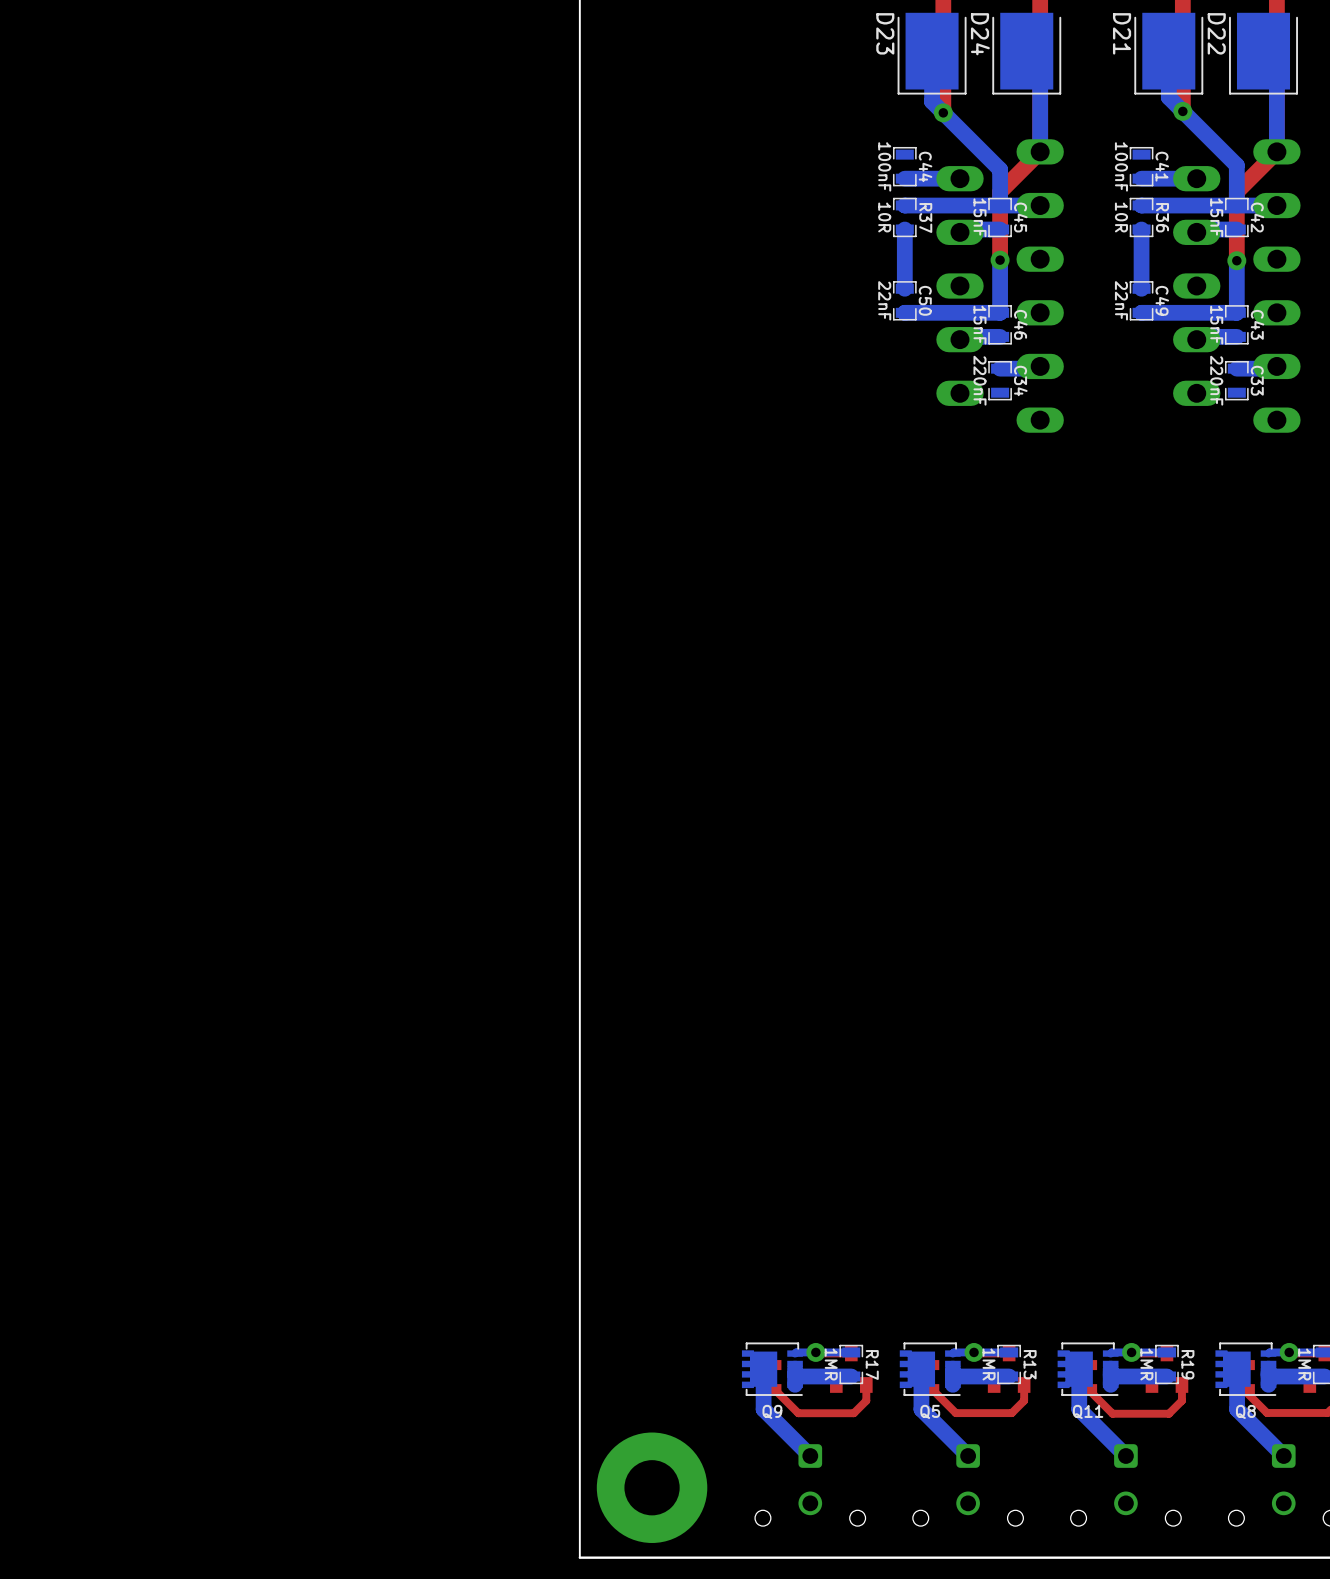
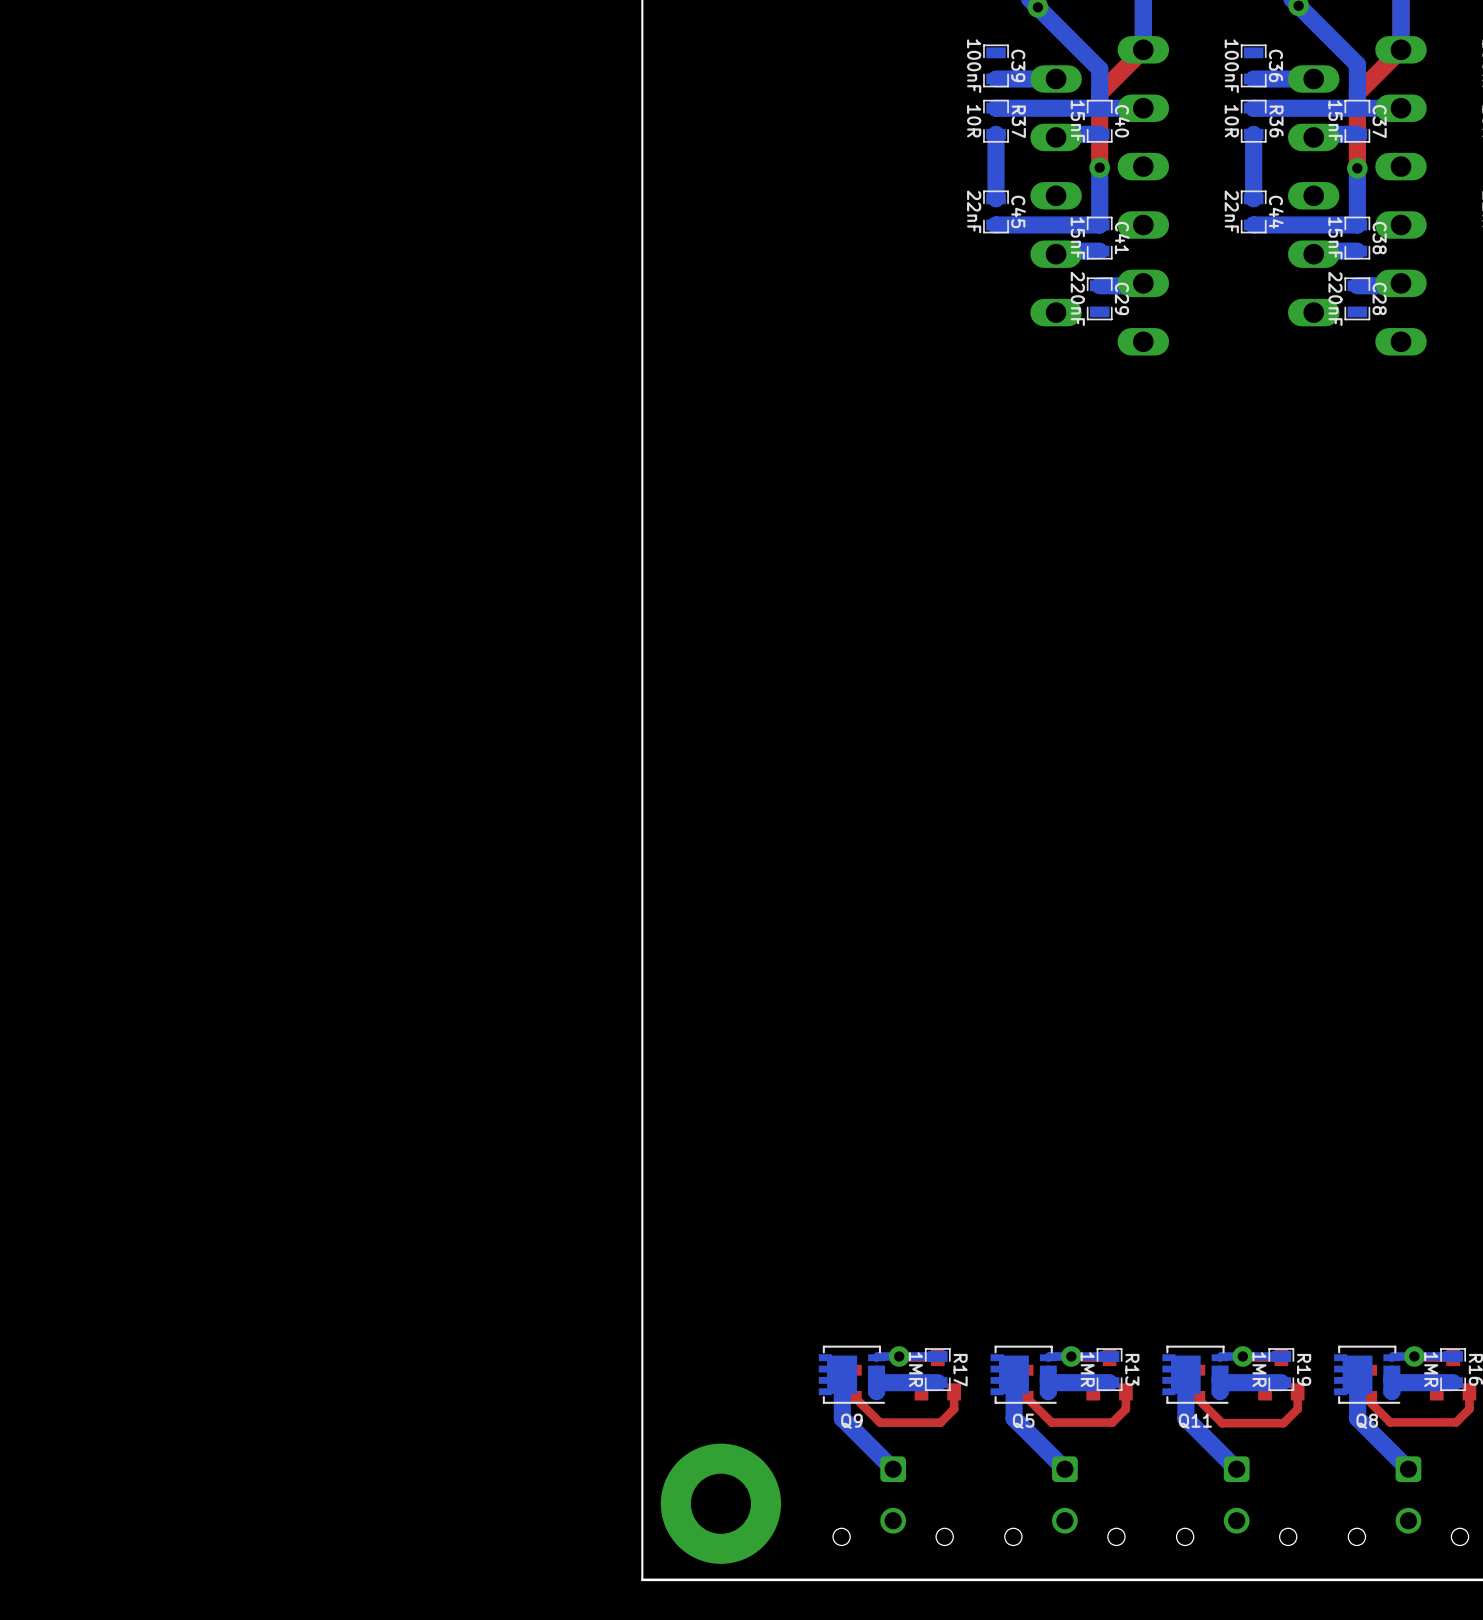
C44 name: C44 (925, 166) -> C39 (1018, 65)
C41 name: C41 (1162, 166) -> C36 (1275, 65)
C45 name: C45 (1020, 217) -> C40 (1122, 121)
C42 name: C42 (1257, 217) -> C37 (1379, 121)
C50 name: C50 (925, 300) -> C45 (1018, 211)
C49 name: C49 (1162, 300) -> C44 (1276, 212)
C46 name: C46 (1020, 324) -> C41 (1122, 238)
C43 name: C43 (1257, 324) -> C38 (1379, 238)
C34 name: C34 (1020, 380) -> C29 (1121, 298)
C33 name: C33 (1257, 380) -> C28 (1379, 298)

